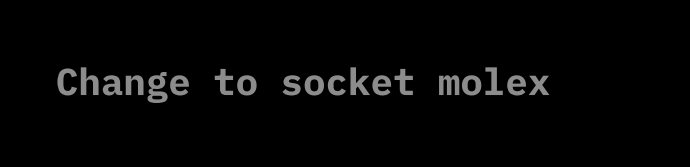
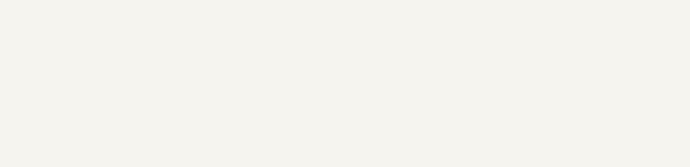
text: Change to socket molex (303, 85) -> none

